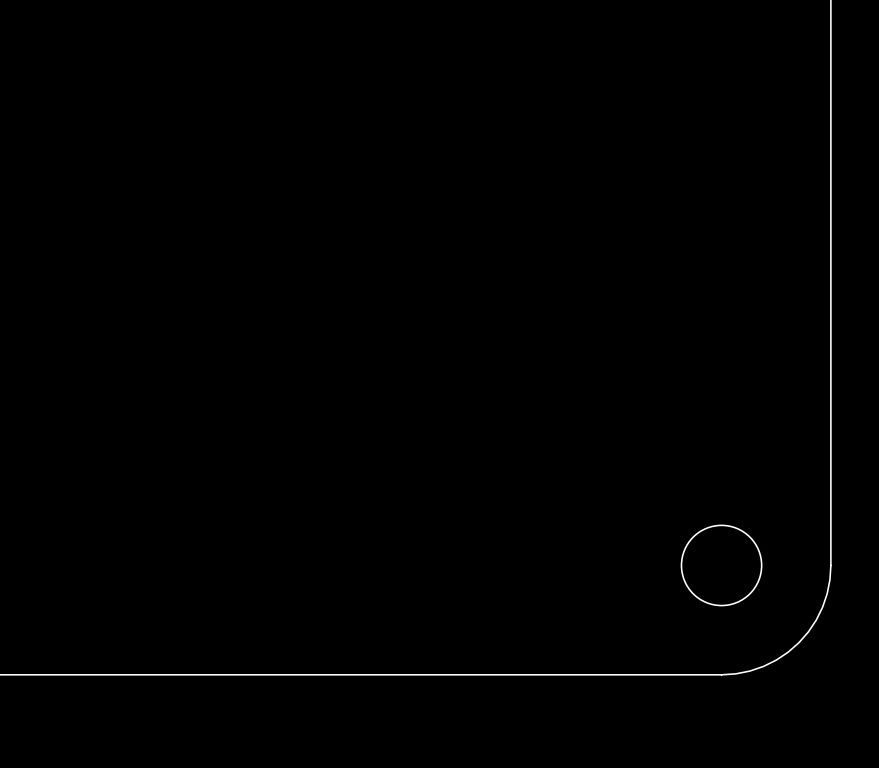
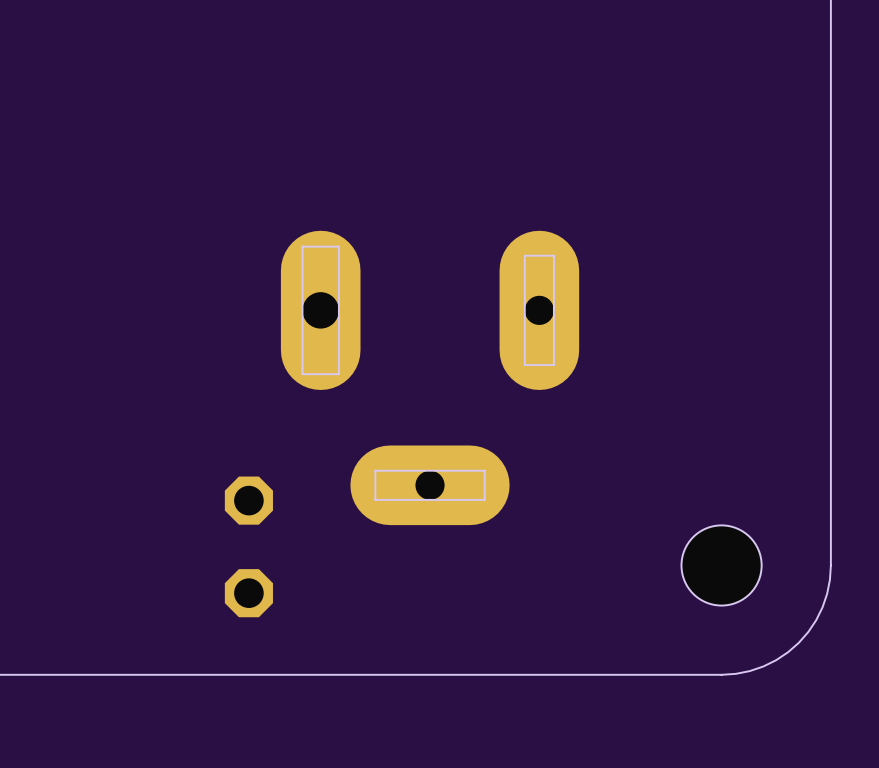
part: none -> (430, 377)
part: none -> (248, 546)

